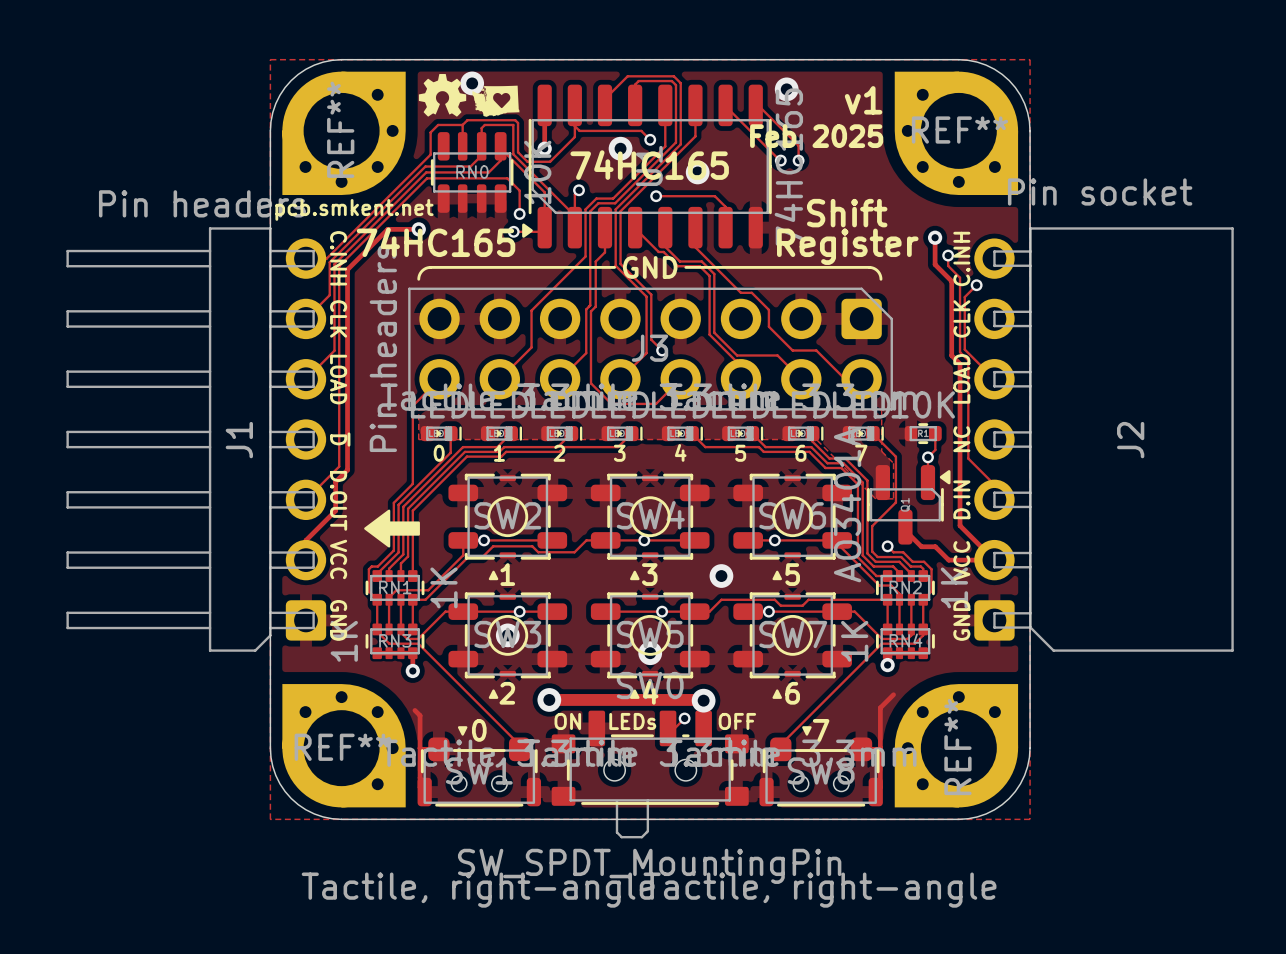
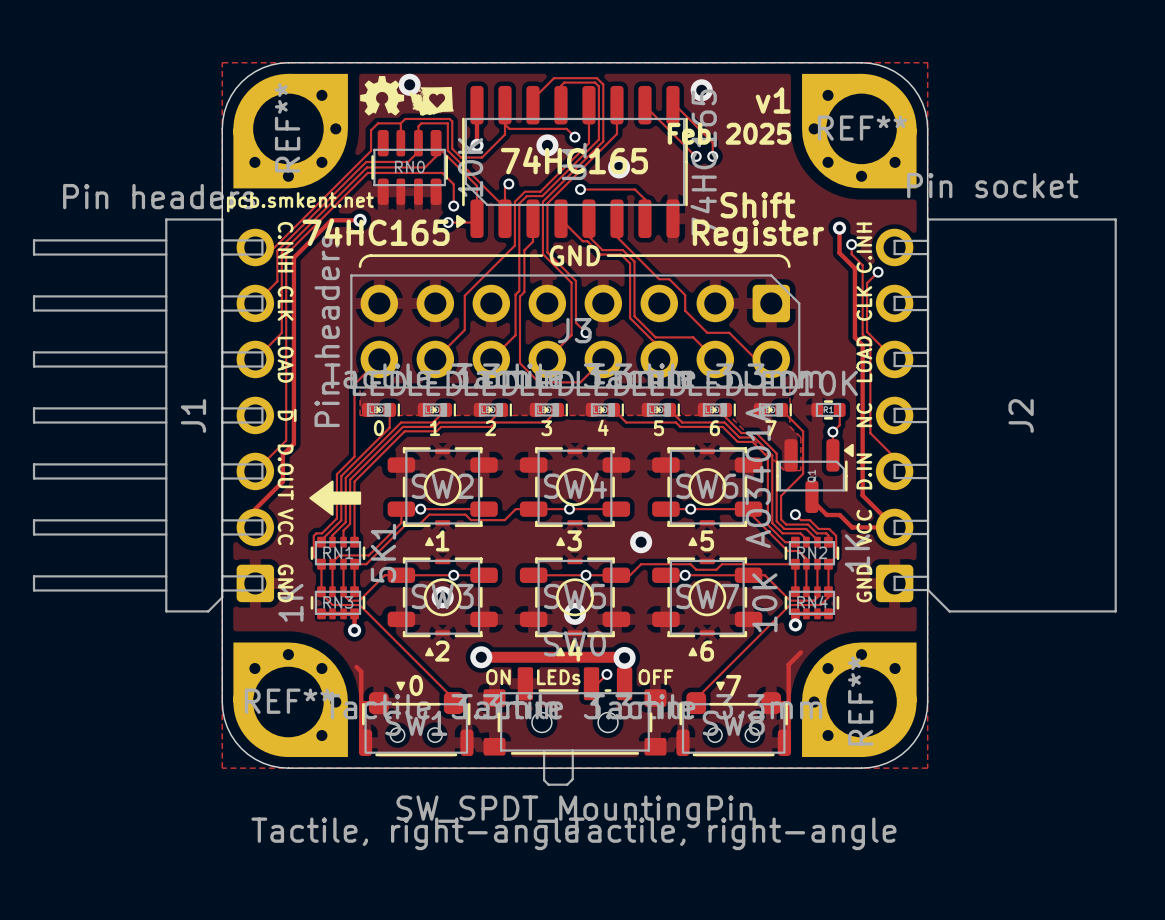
RN1 value: 1K (443, 587) -> 5K1 (383, 553)
RN4 value: 1K (854, 641) -> 10K (764, 602)

